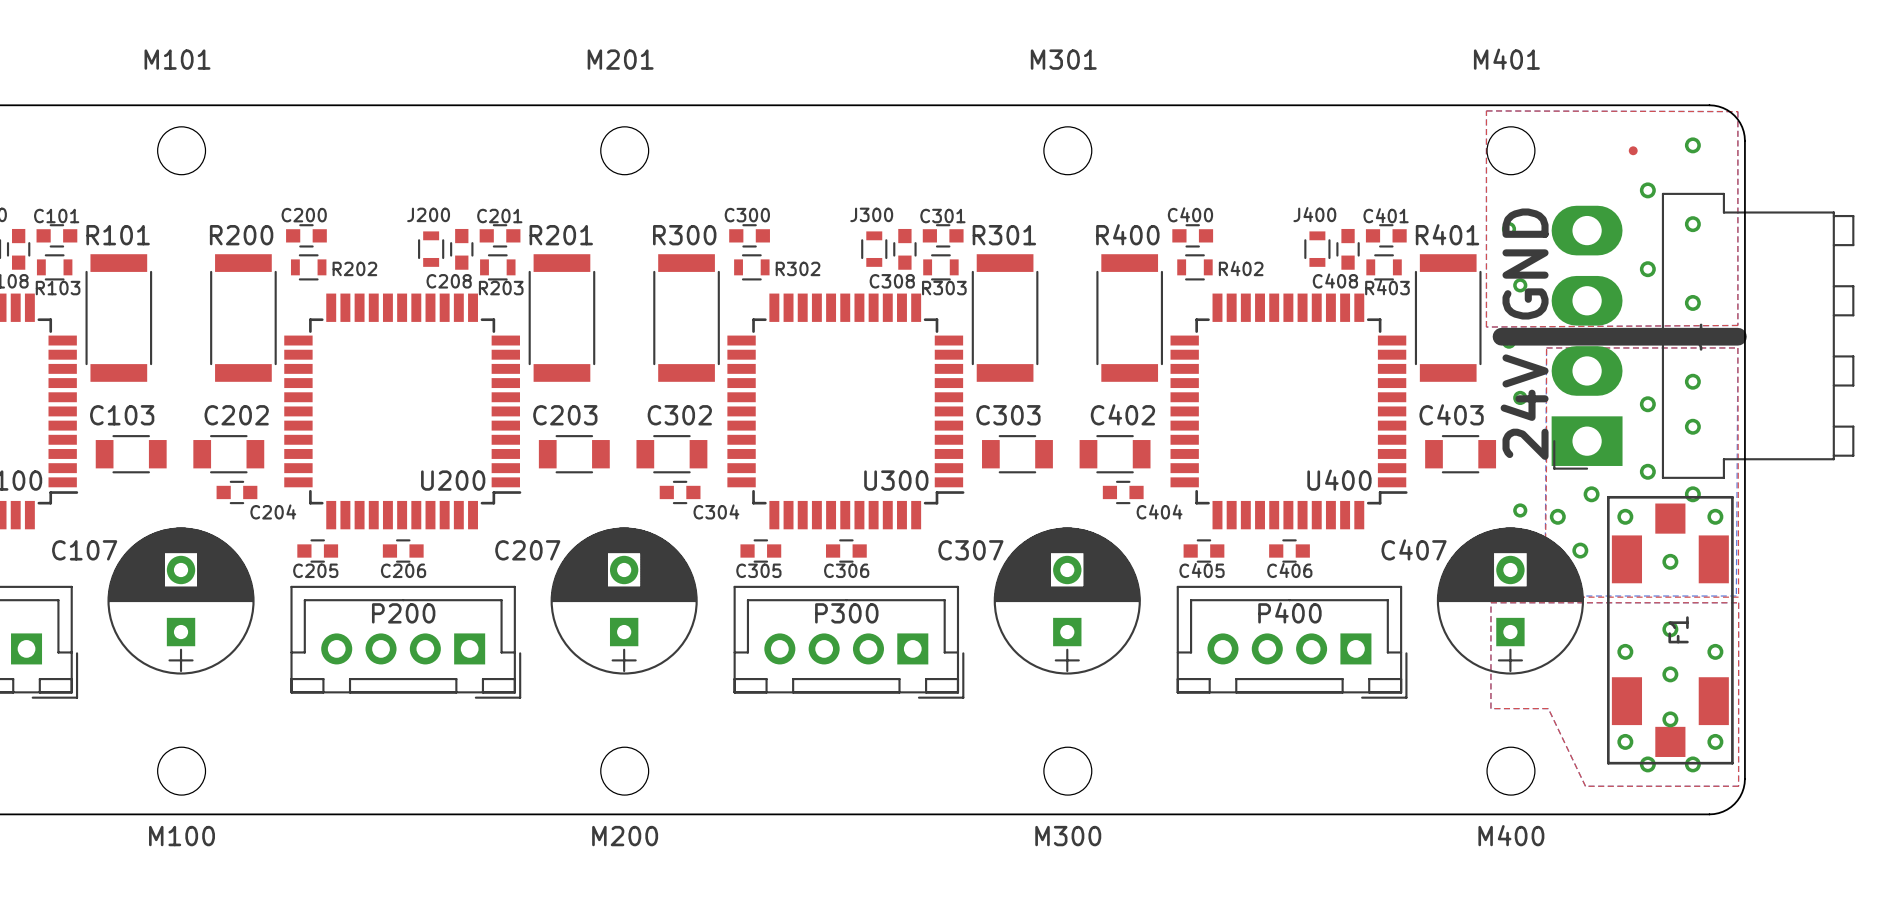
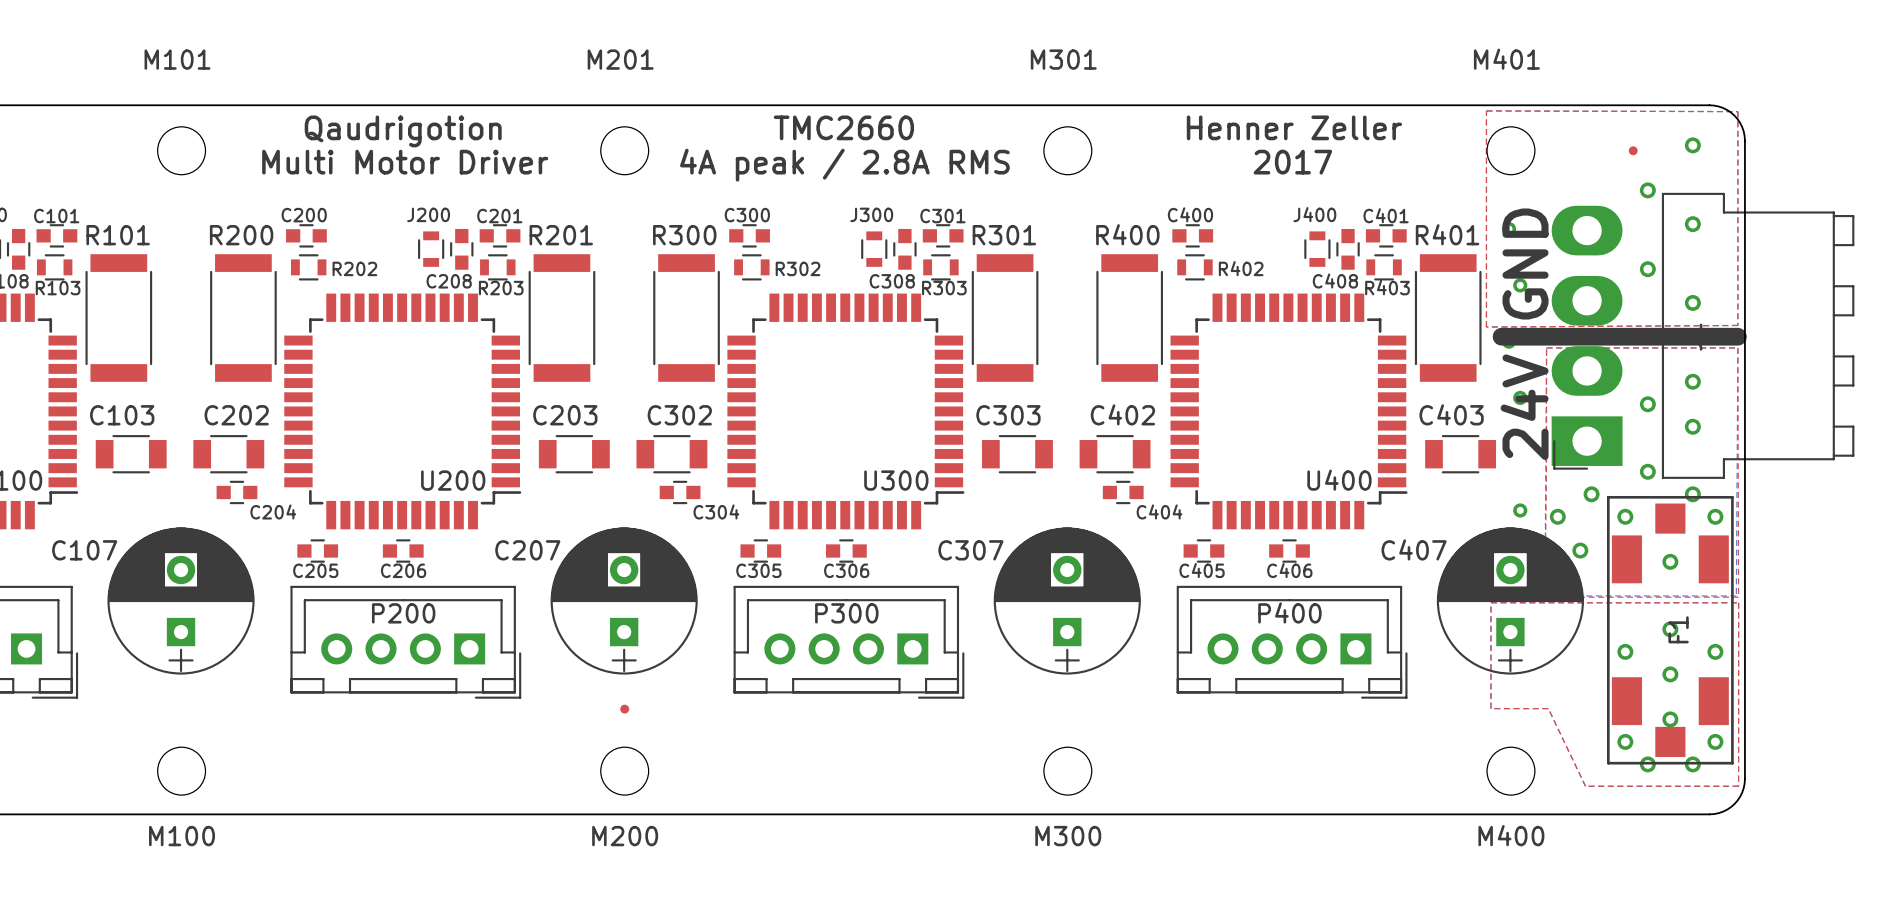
text: none -> TMC2660 (843, 127)
text: none -> Henner Zeller (1294, 127)
text: none -> Qaudrigotion (403, 131)
text: none -> Multi Motor Driver (405, 162)
text: none -> 2017 (1292, 162)
text: none -> 4A peak / 2.8A RMS (844, 165)
part: none -> (624, 709)

